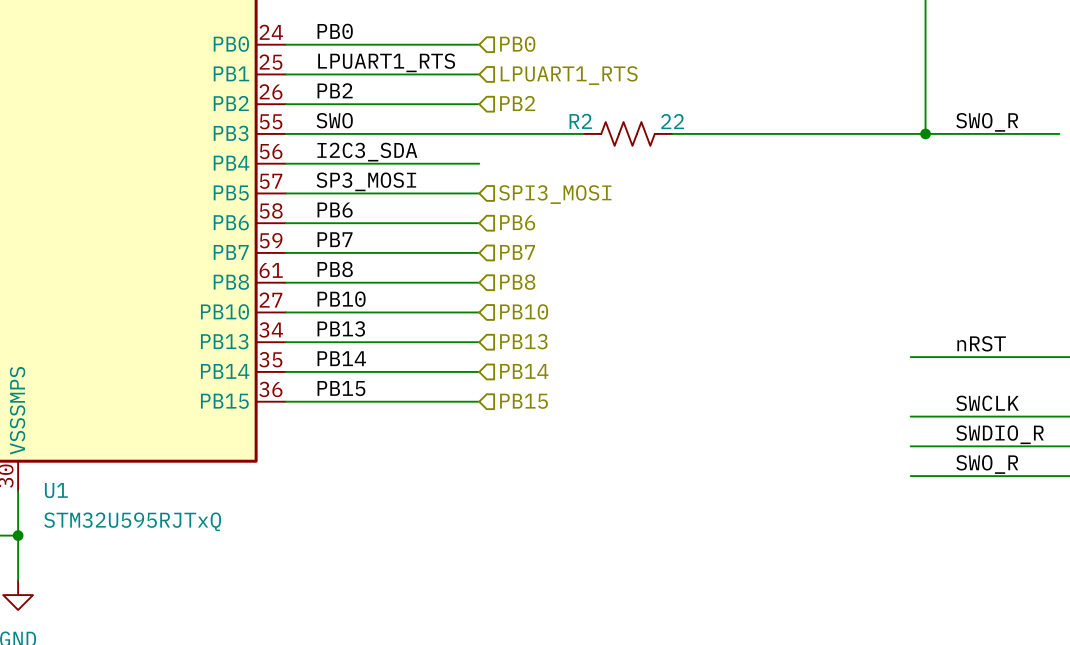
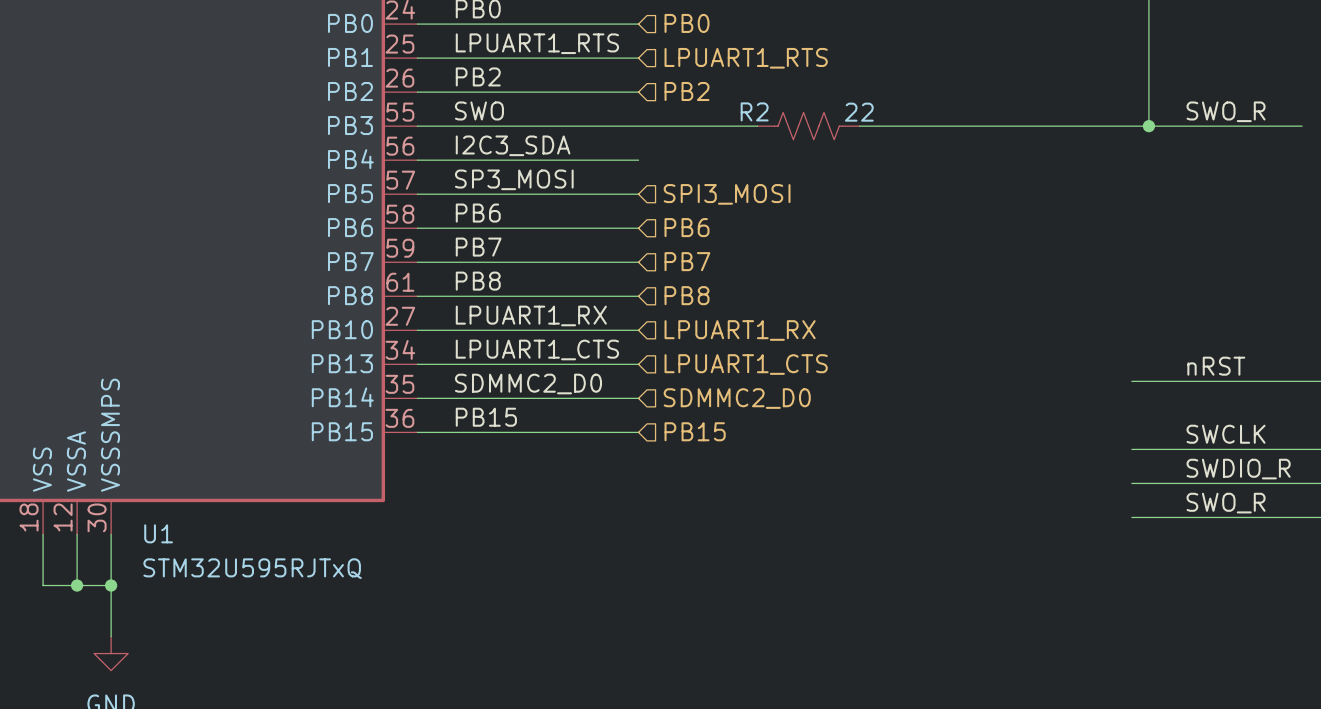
label: PB10 (341, 299) -> LPUART1_RX (531, 315)
hierarchical label: PB10 (524, 311) -> LPUART1_RX (740, 330)
label: PB13 (341, 328) -> LPUART1_CTS (537, 349)
hierarchical label: PB13 (523, 341) -> LPUART1_CTS (746, 364)
label: PB14 (341, 358) -> SDMMC2_D0 (528, 384)
hierarchical label: PB14 (524, 371) -> SDMMC2_D0 (737, 398)

